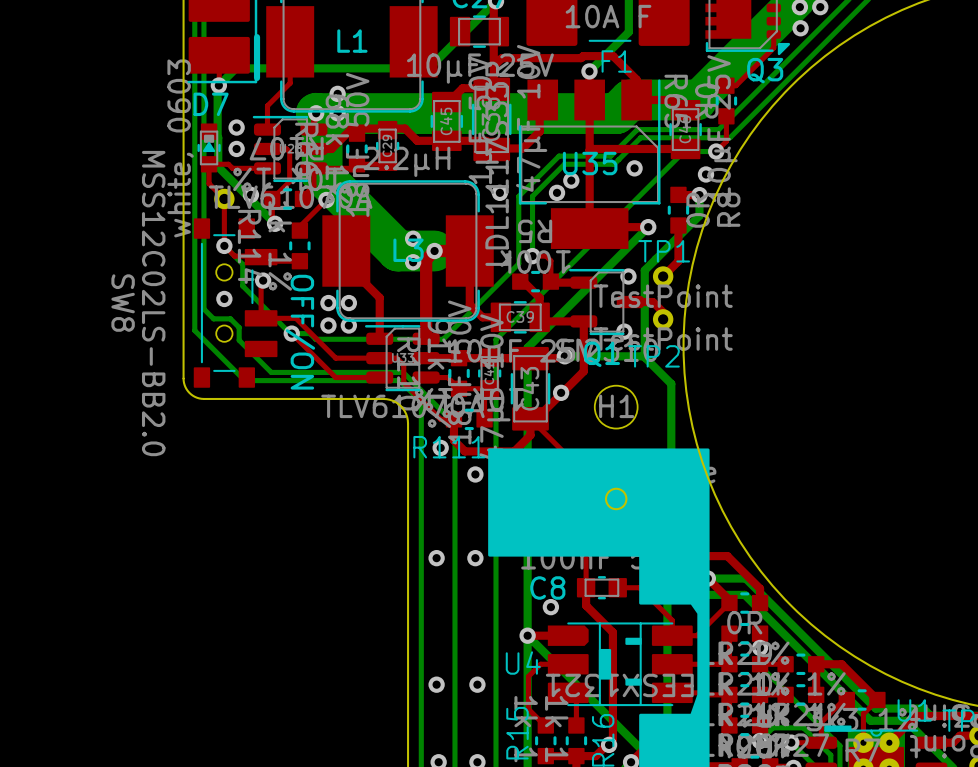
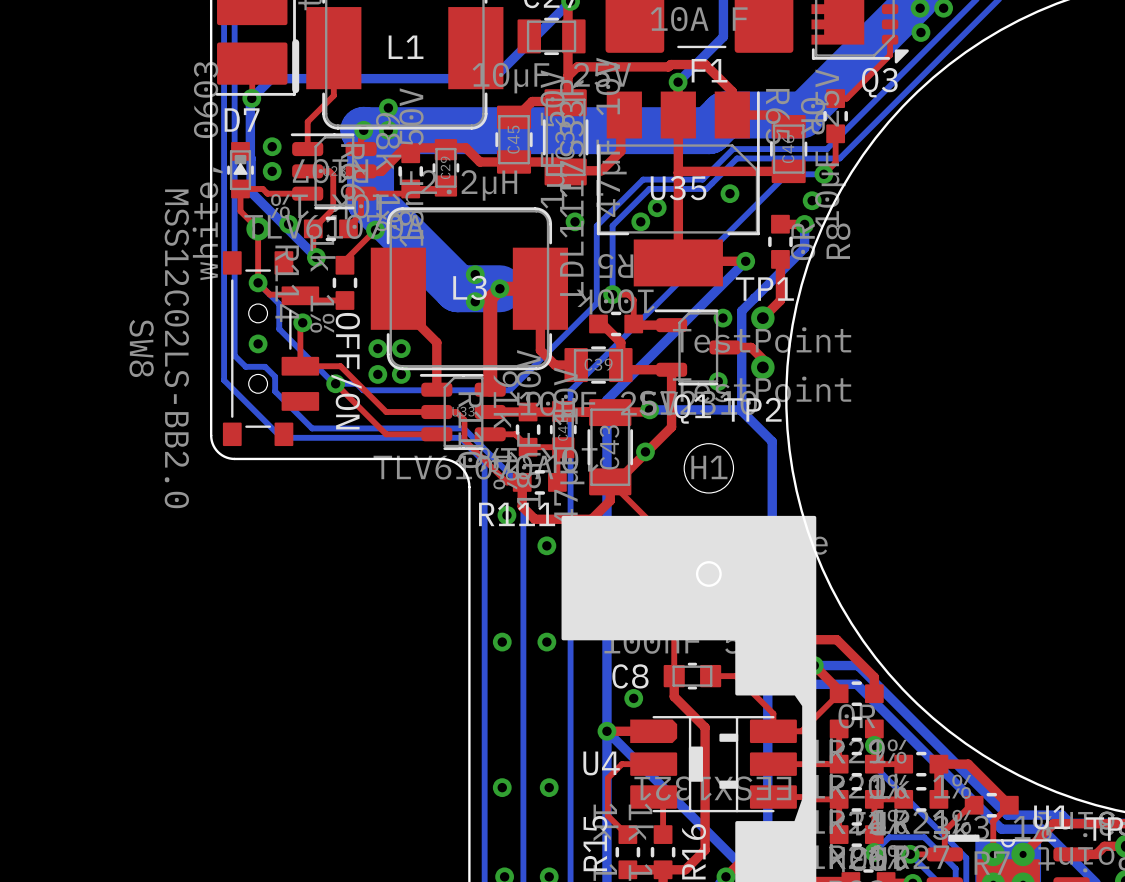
via: (609, 744) -> none

